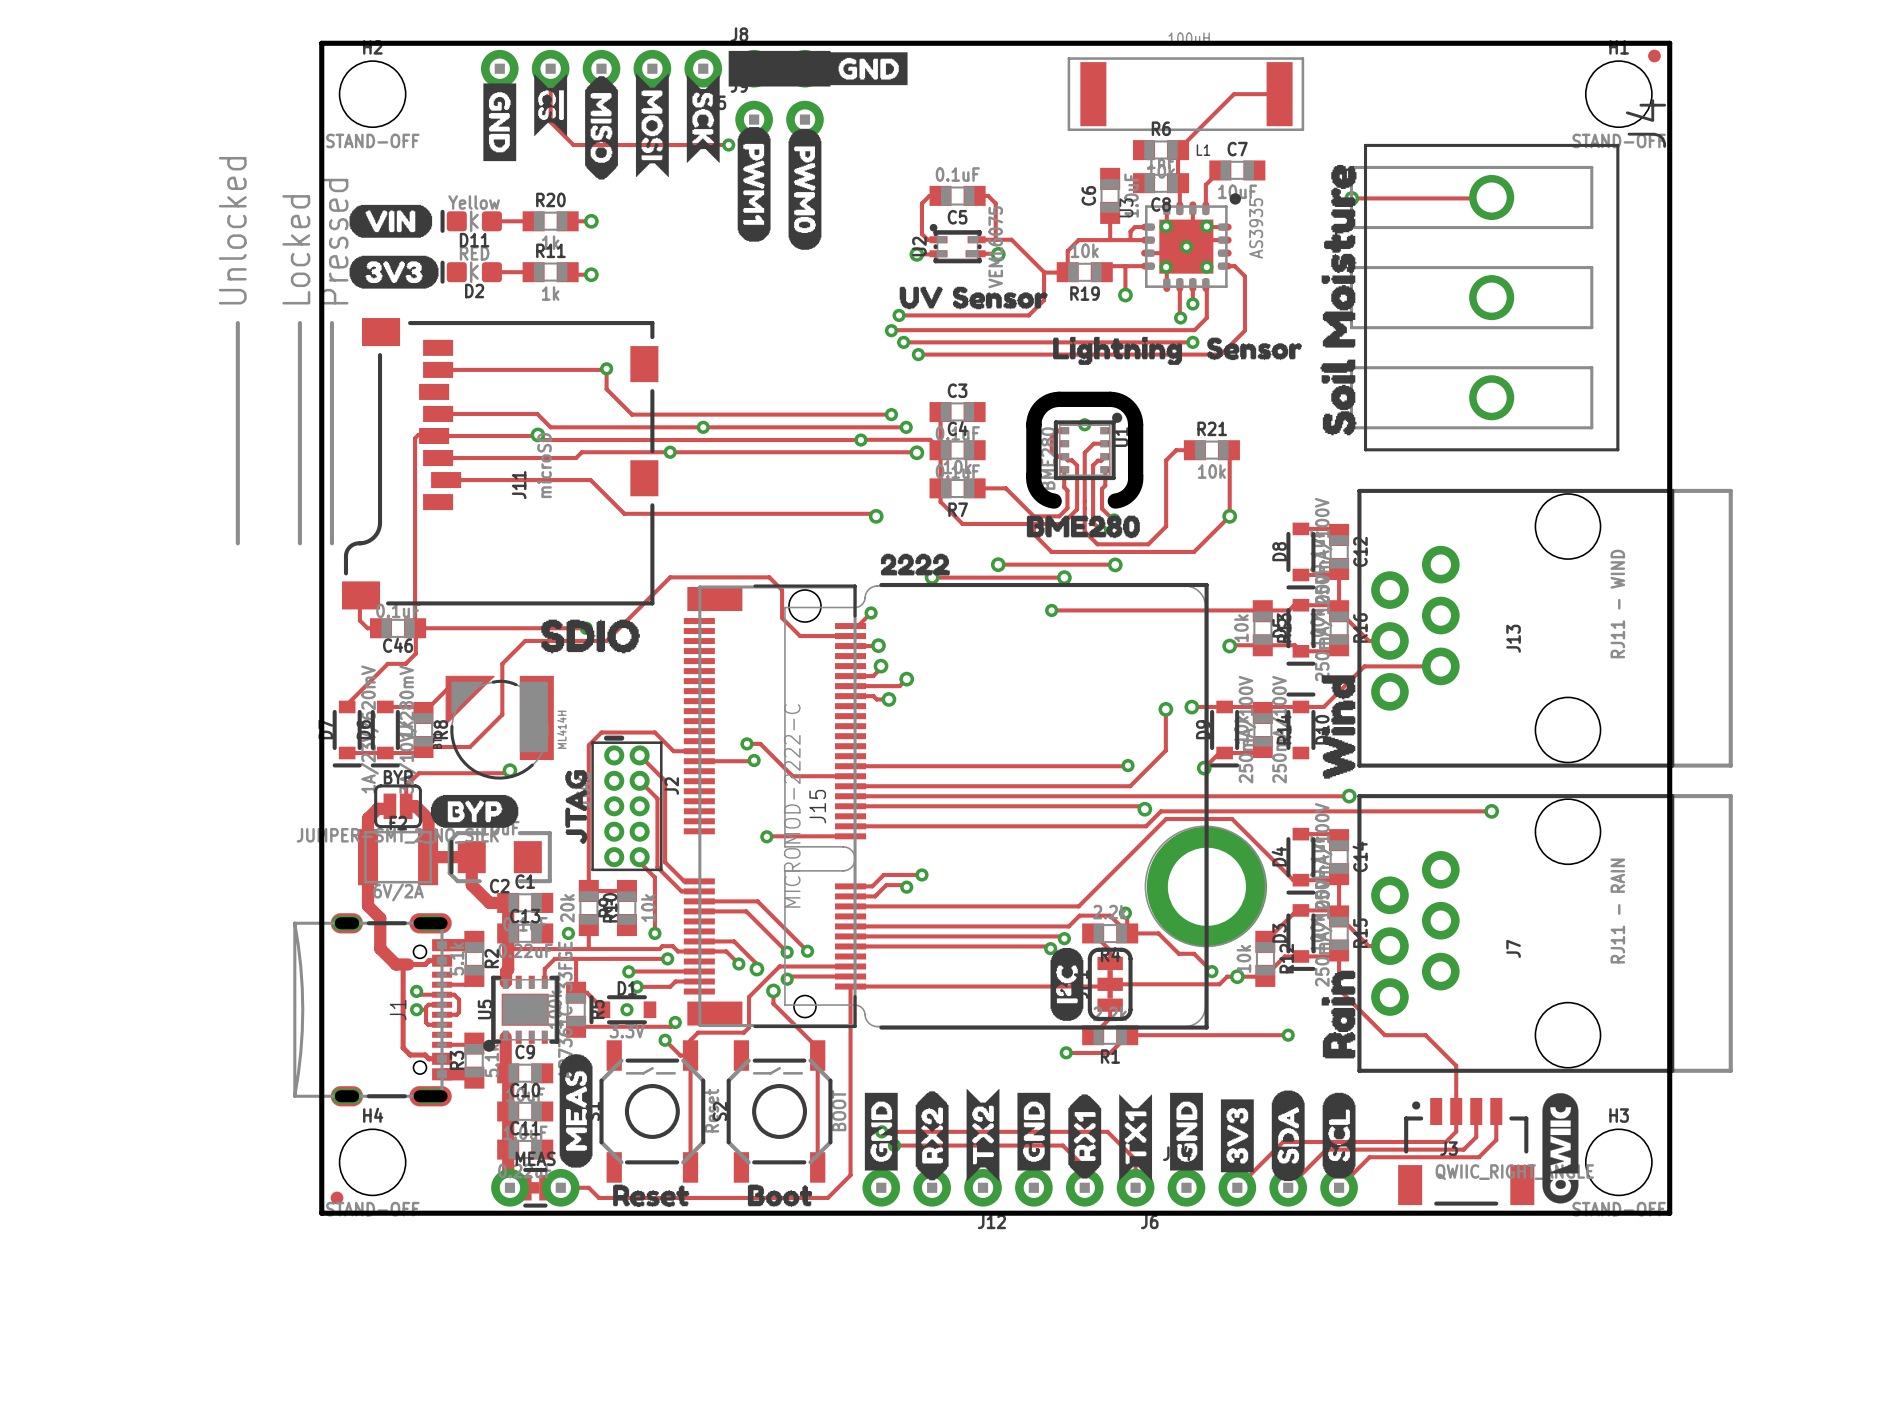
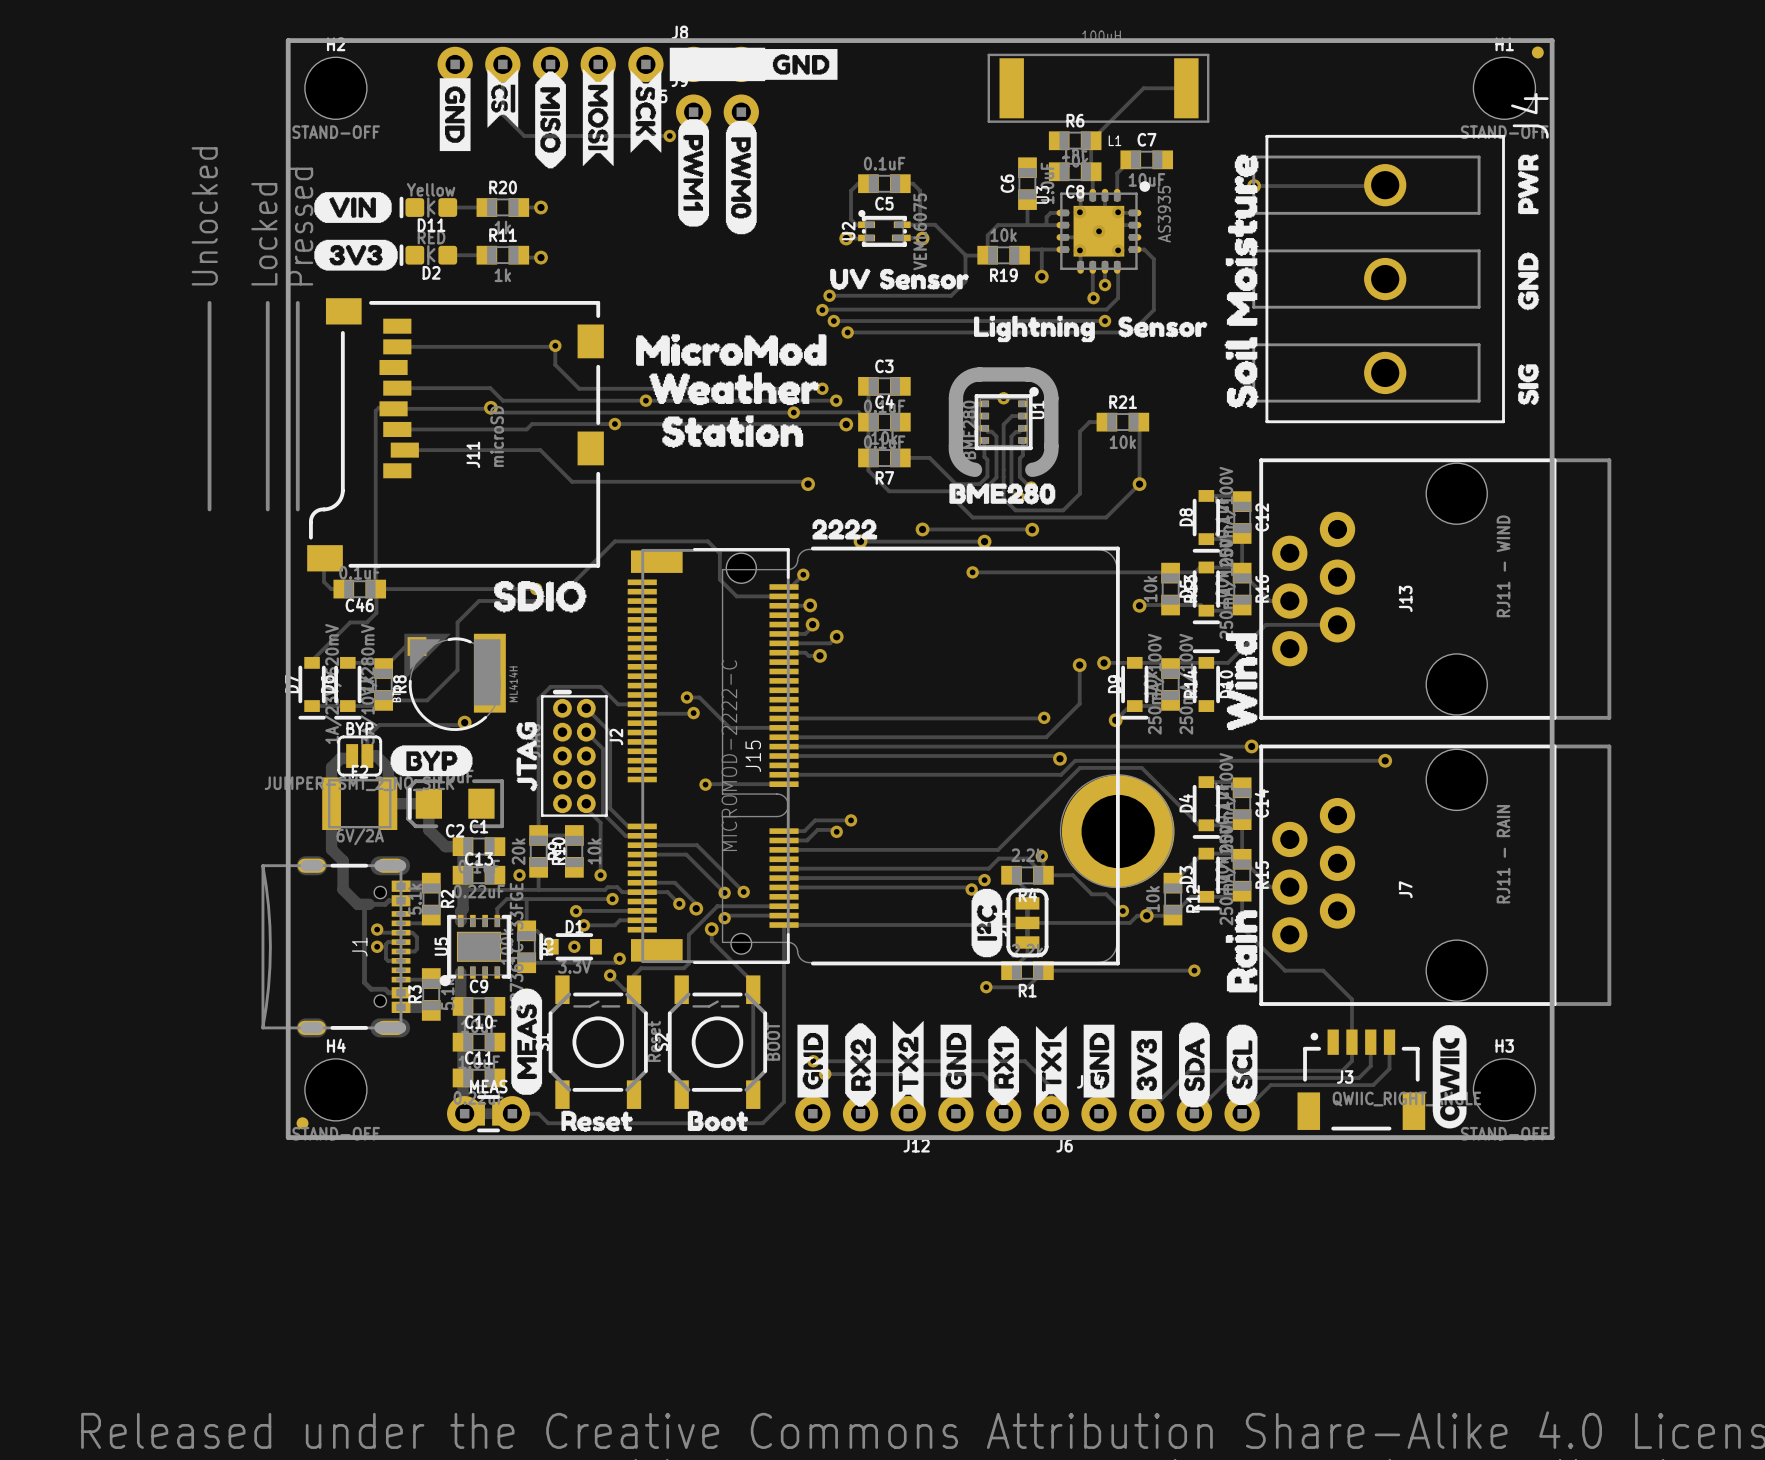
drawing: none -> [1518, 154, 1539, 215]
drawing: none -> [1517, 252, 1540, 311]
drawing: none -> [636, 334, 827, 449]
drawing: none -> [1518, 364, 1540, 405]

